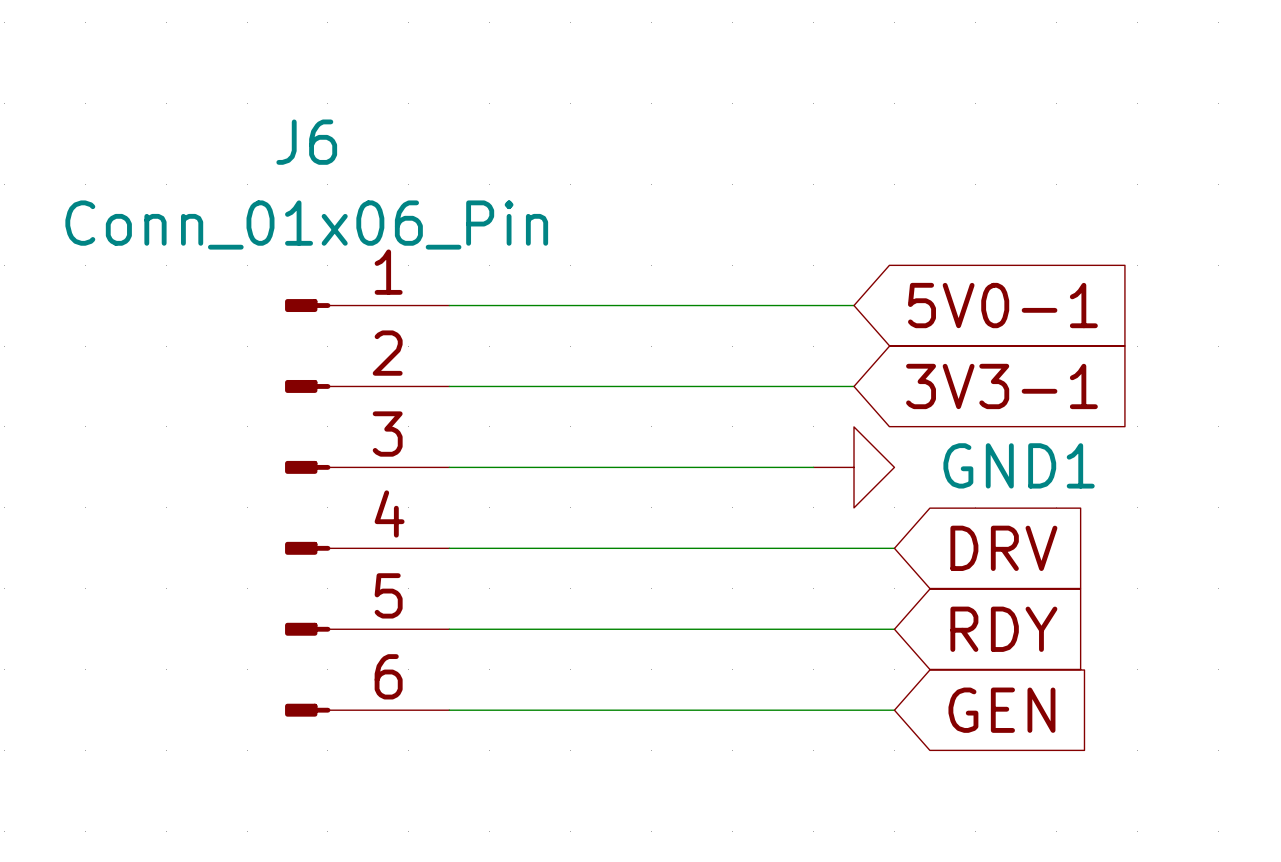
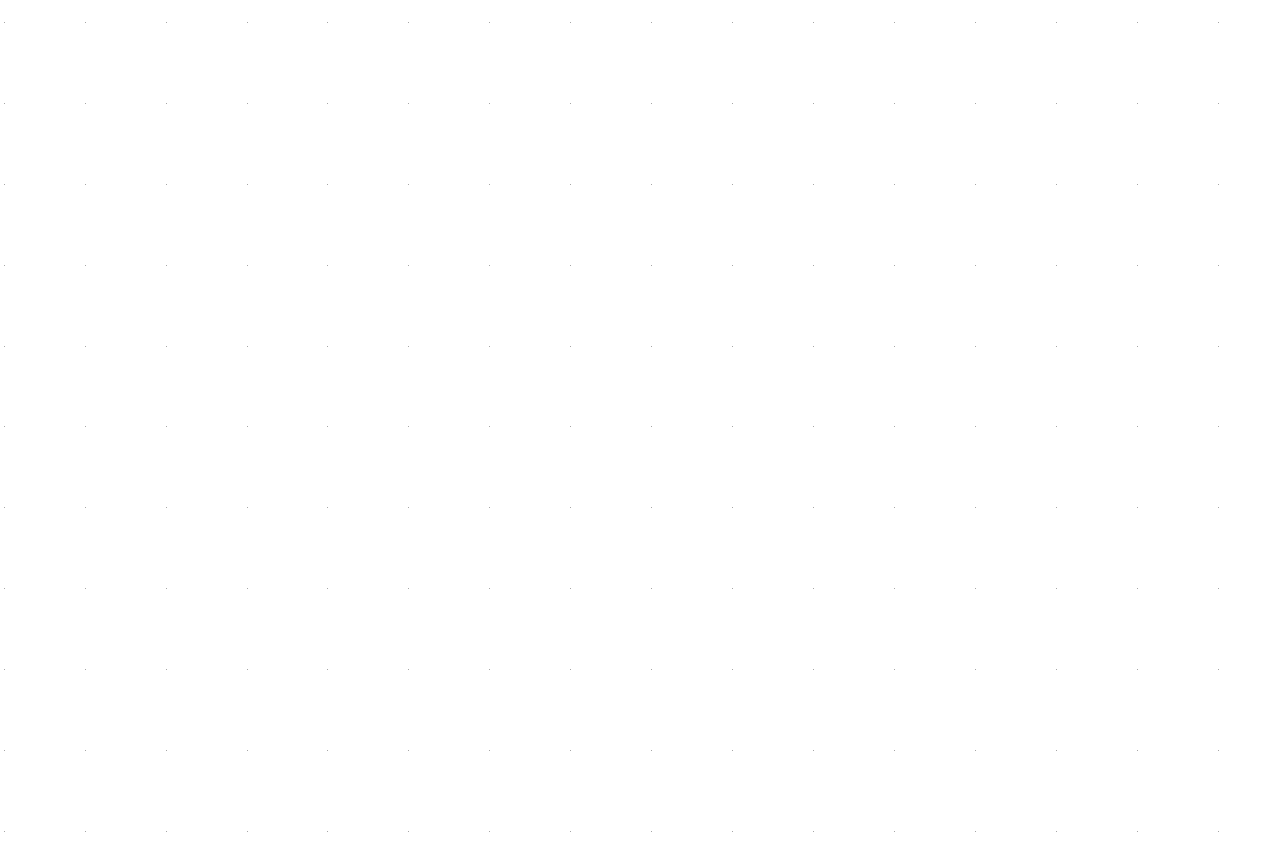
wire: (449, 305) (854, 305) -> none
global label: 5V0-1 (1002, 305) -> none
wire: (449, 386) (854, 386) -> none
global label: 3V3-1 (1001, 386) -> none
wire: (449, 467) (813, 467) -> none
power symbol: GND1 (854, 467) -> none
J6: Conn_01x06_Pin (367, 507) -> none
wire: (449, 548) (894, 548) -> none
global label: DRV (1003, 548) -> none
wire: (449, 629) (894, 629) -> none
global label: RDY (1003, 629) -> none
wire: (449, 710) (894, 710) -> none
global label: GEN (1001, 710) -> none

